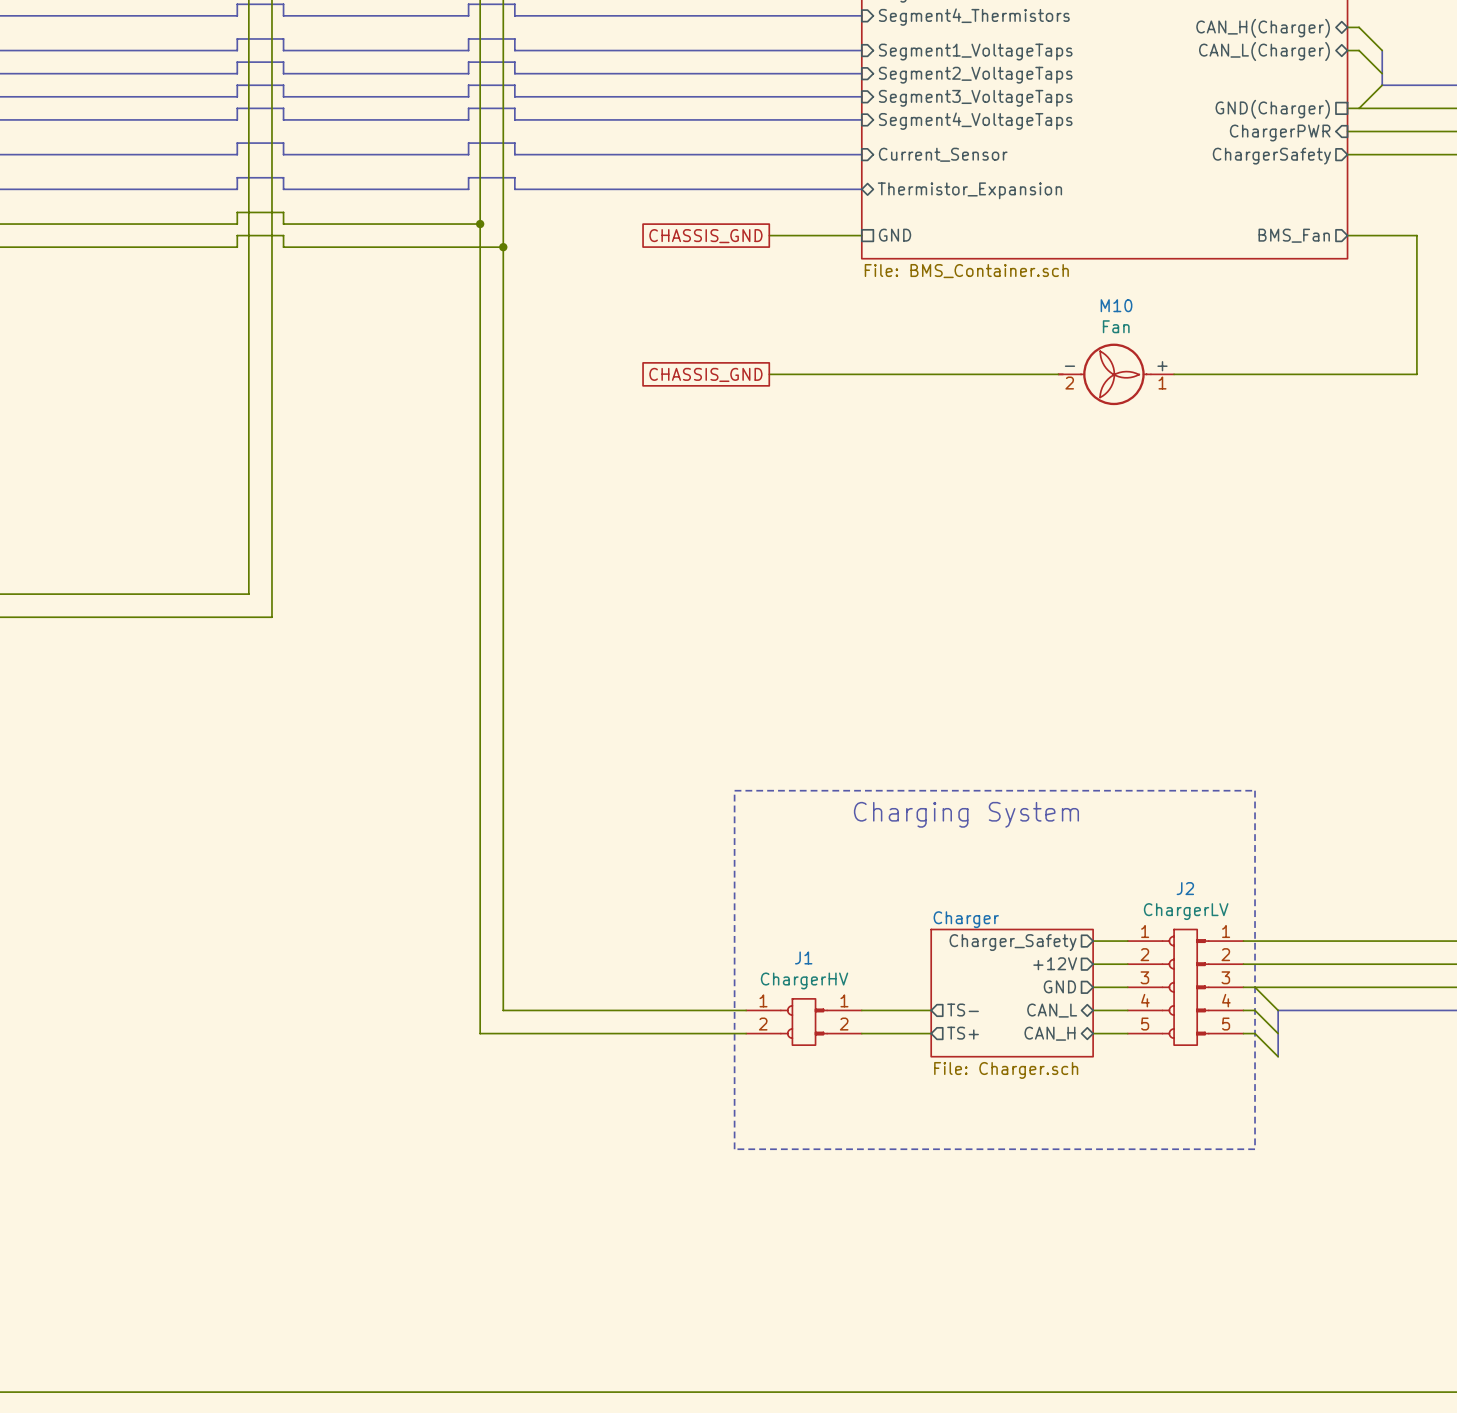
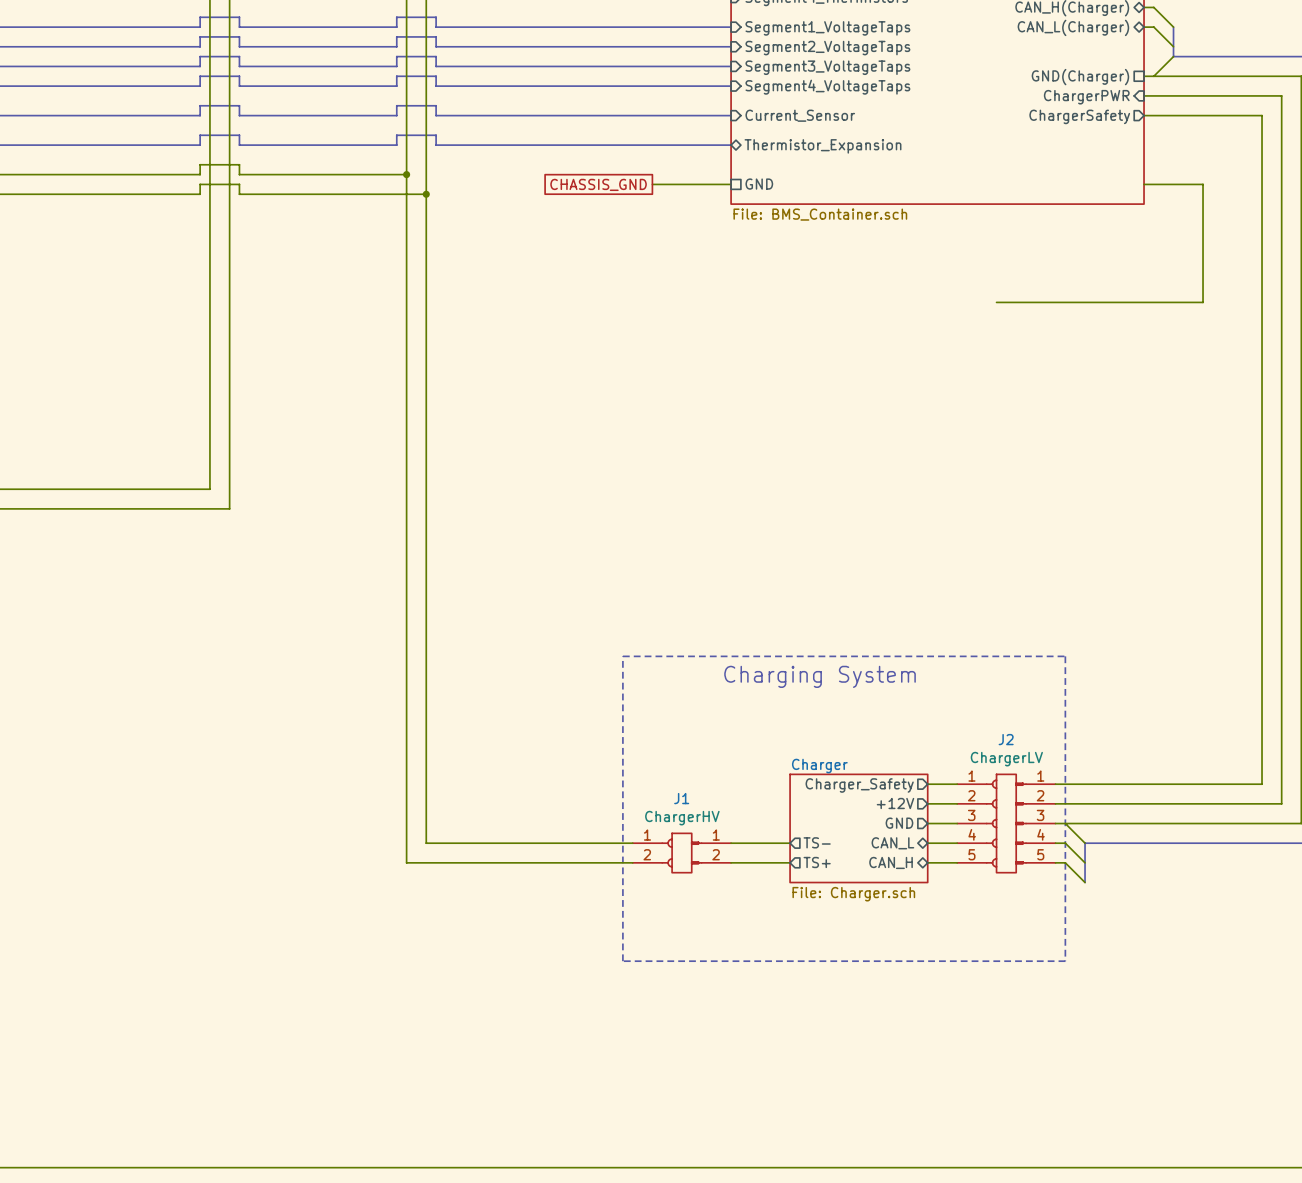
sheet pin: BMS_Fan (1294, 235) -> none
global label: CHASSIS_GND (705, 374) -> none
wire: (769, 374) (1058, 374) -> none
M10: Fan (1116, 374) -> none

